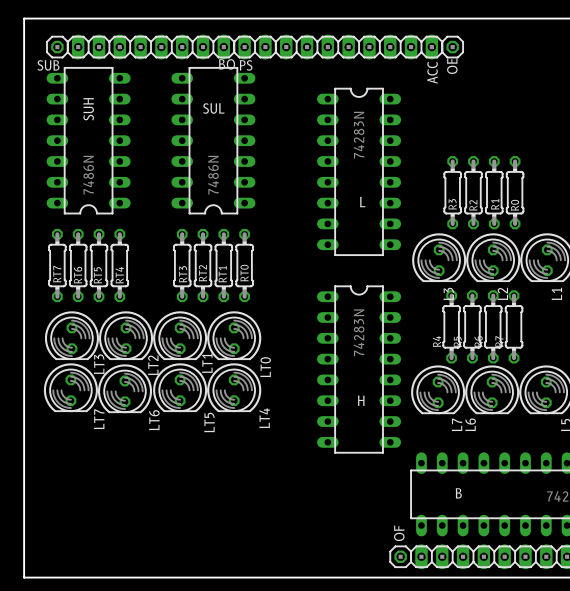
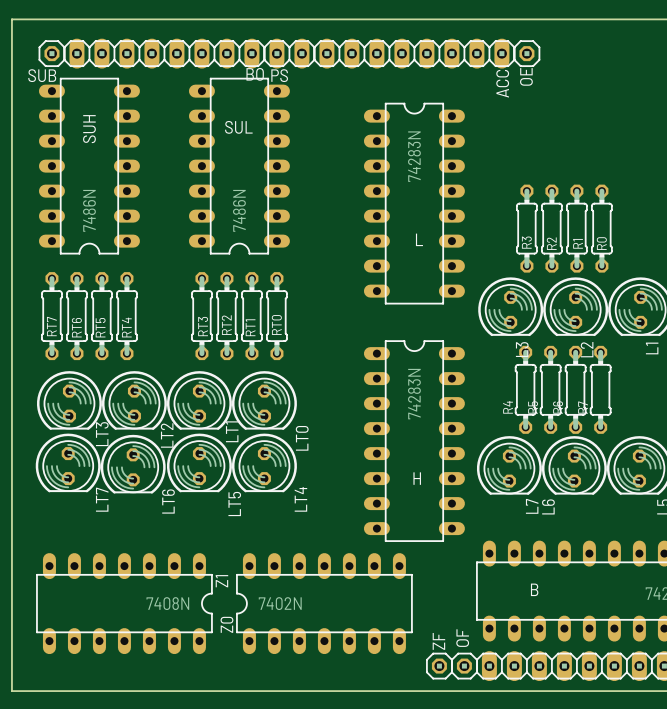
Z1: none -> 7408N (124, 603)
Z0: none -> 7402N (324, 603)
ZF: none -> (439, 666)

